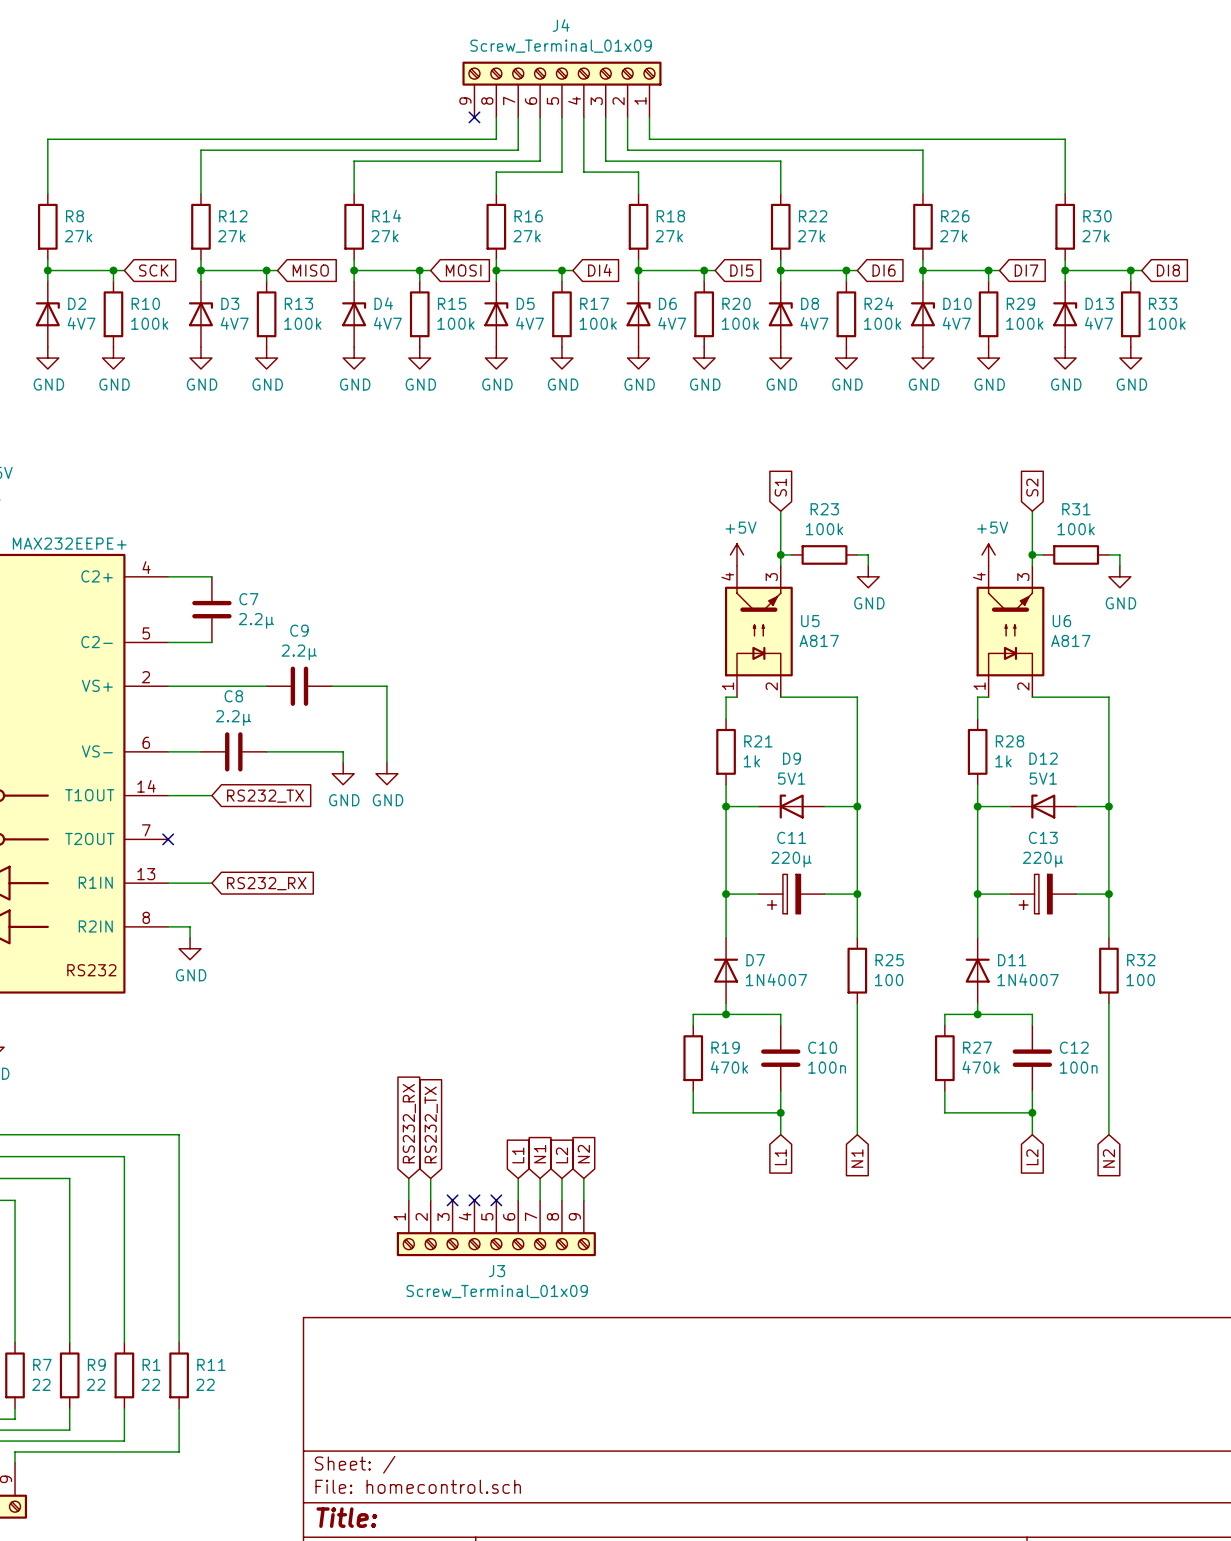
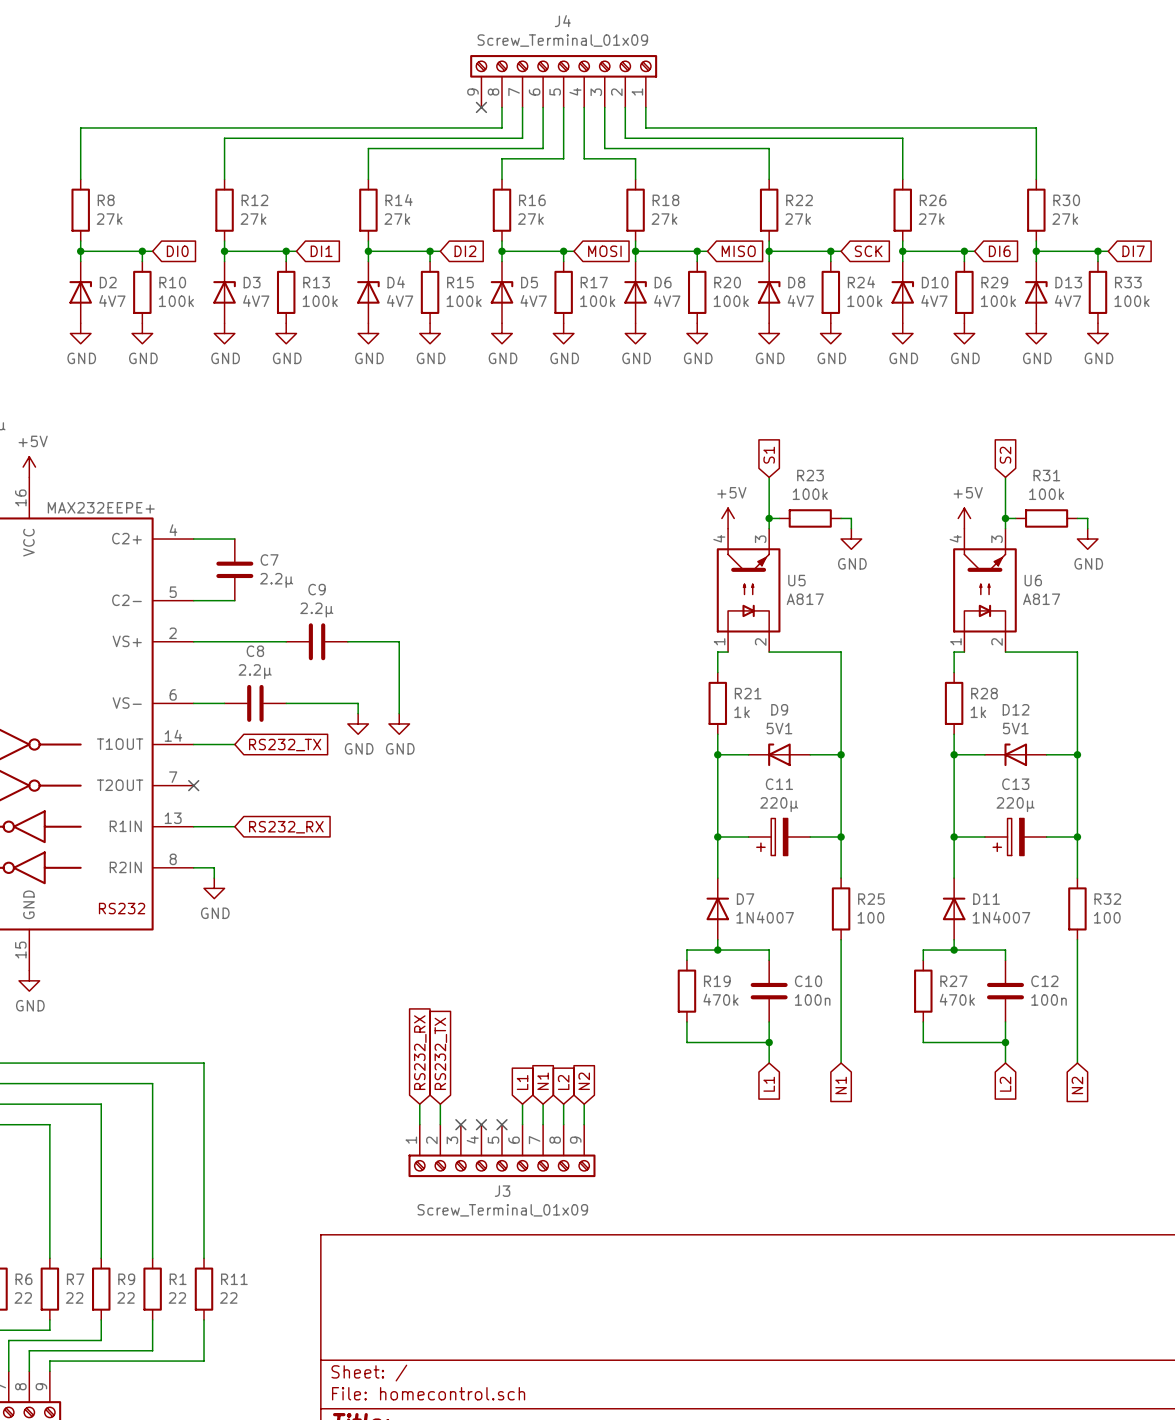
global label: SCK (153, 270) -> DI0 (177, 251)
global label: MISO (310, 270) -> DI1 (321, 251)
global label: MOSI (463, 270) -> DI2 (465, 251)
global label: DI4 (599, 270) -> MOSI (604, 251)
global label: DI5 (741, 270) -> MISO (738, 251)
global label: DI6 (884, 270) -> SCK (868, 251)
global label: DI7 (1026, 270) -> DI6 (999, 251)
global label: DI8 (1168, 270) -> DI7 (1133, 251)

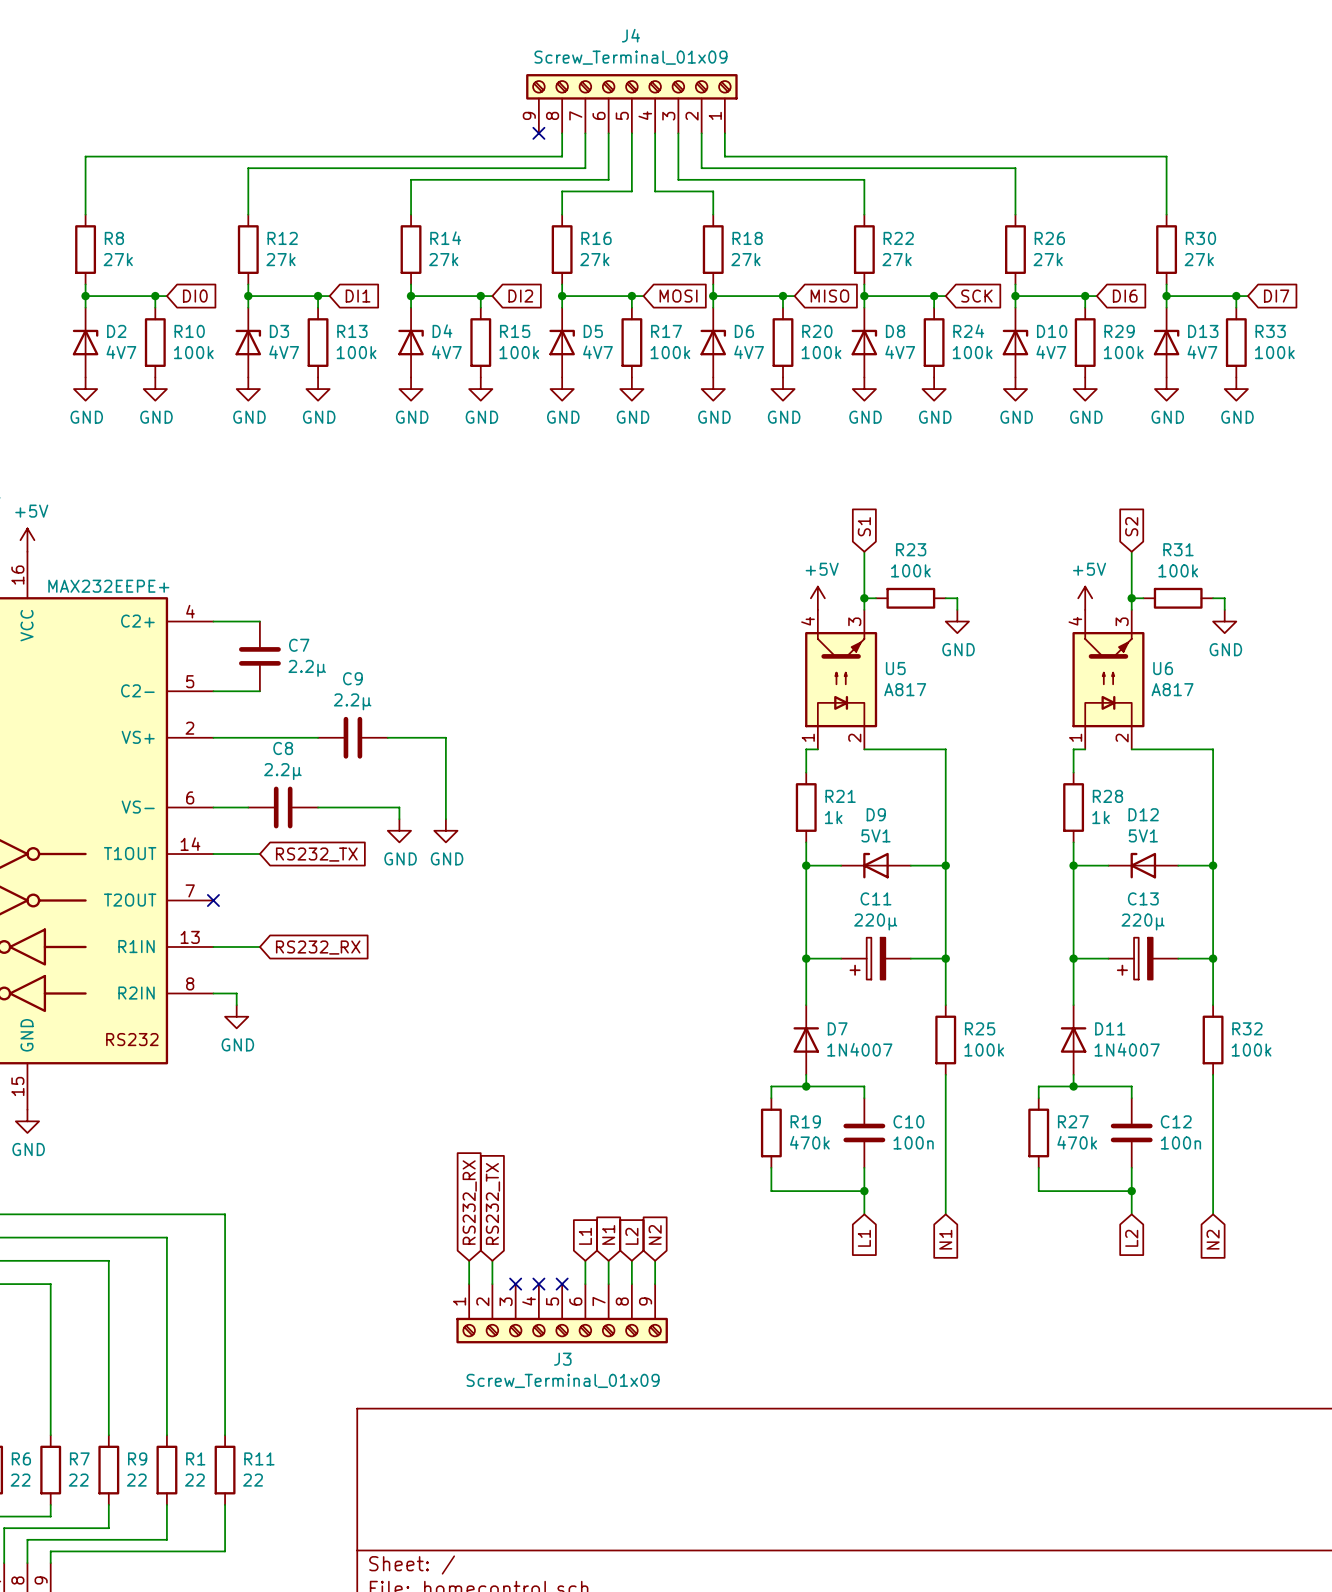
R25 value: 100 (870, 917) -> 100k (984, 1050)
R32 value: 100 (1107, 917) -> 100k (1251, 1050)

